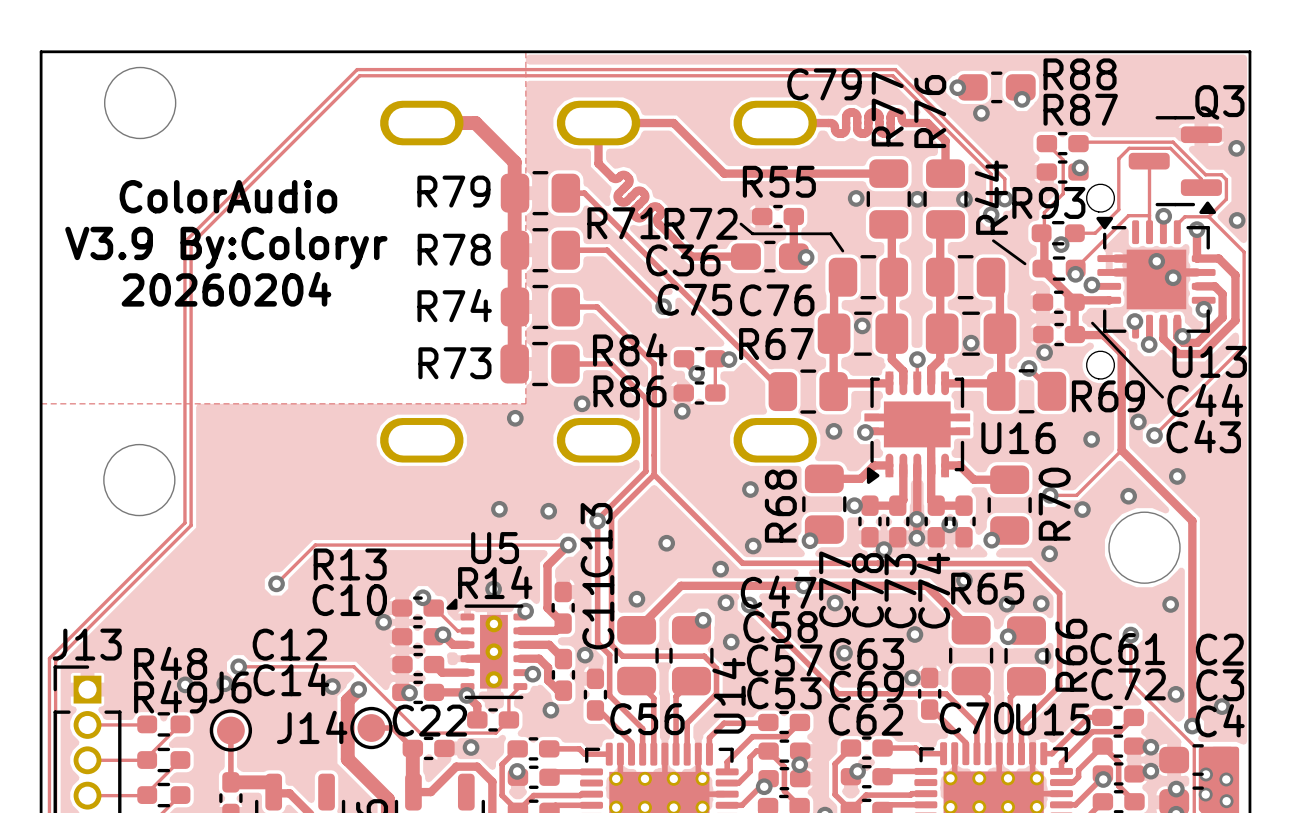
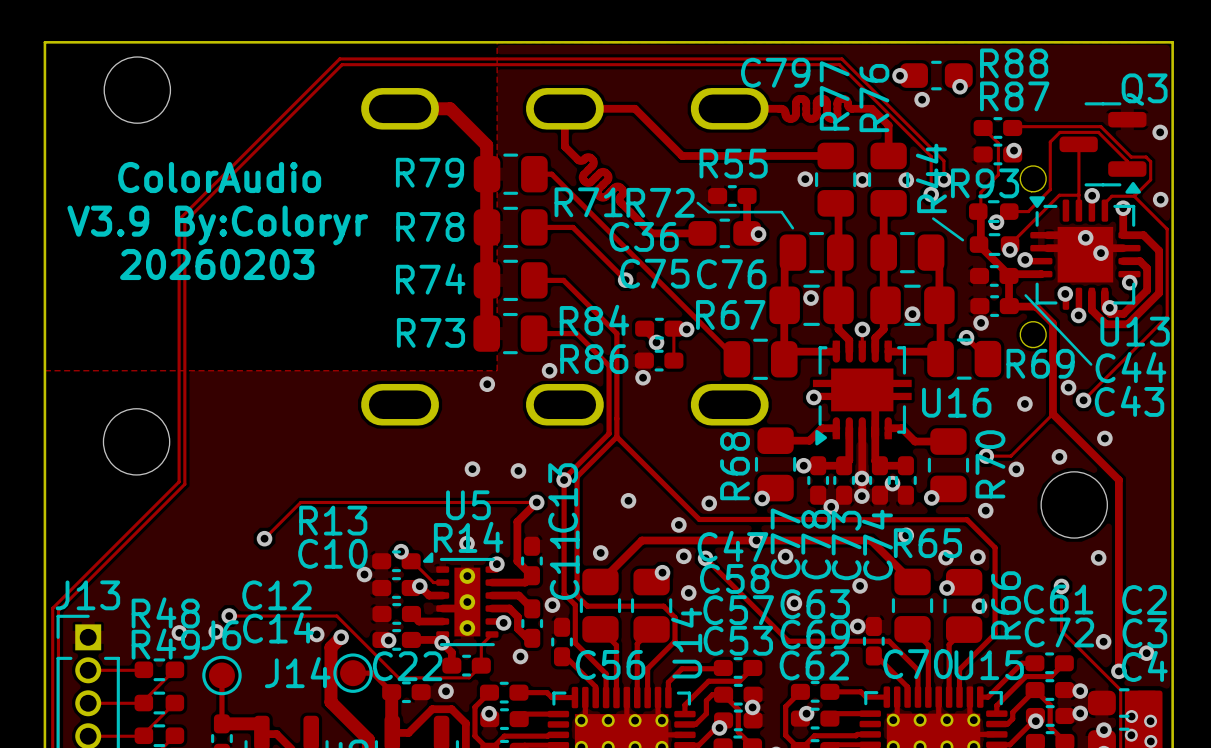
text: 20260204 (226, 289) -> 20260203 (217, 264)
via: (833, 431) -> none
via: (750, 489) -> none

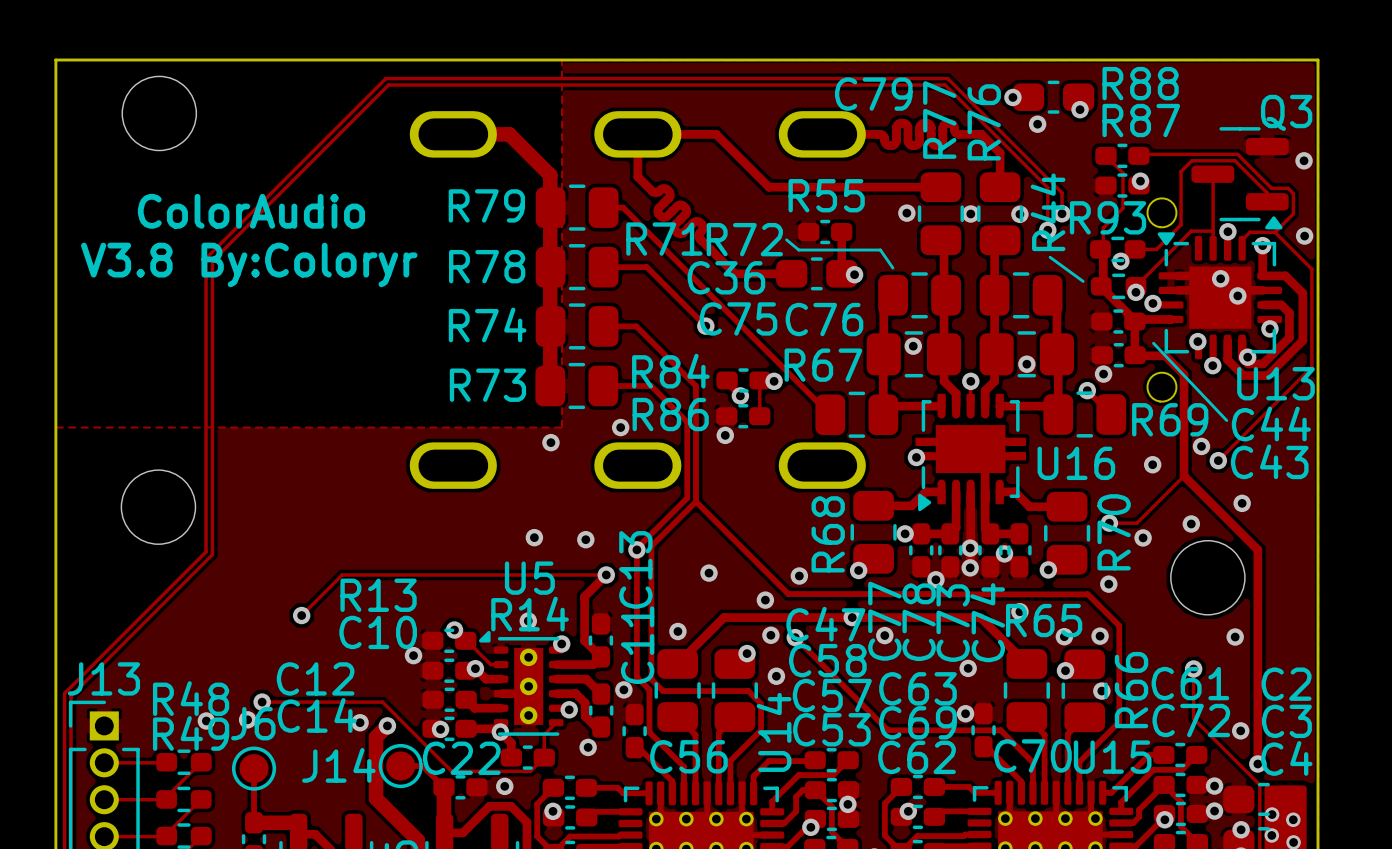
text: V3.9 By:Coloryr (217, 225) -> V3.8 By:Coloryr (249, 264)
text: 20260203 (217, 264) -> none
via: (794, 603) -> none
via: (1146, 653) -> none

